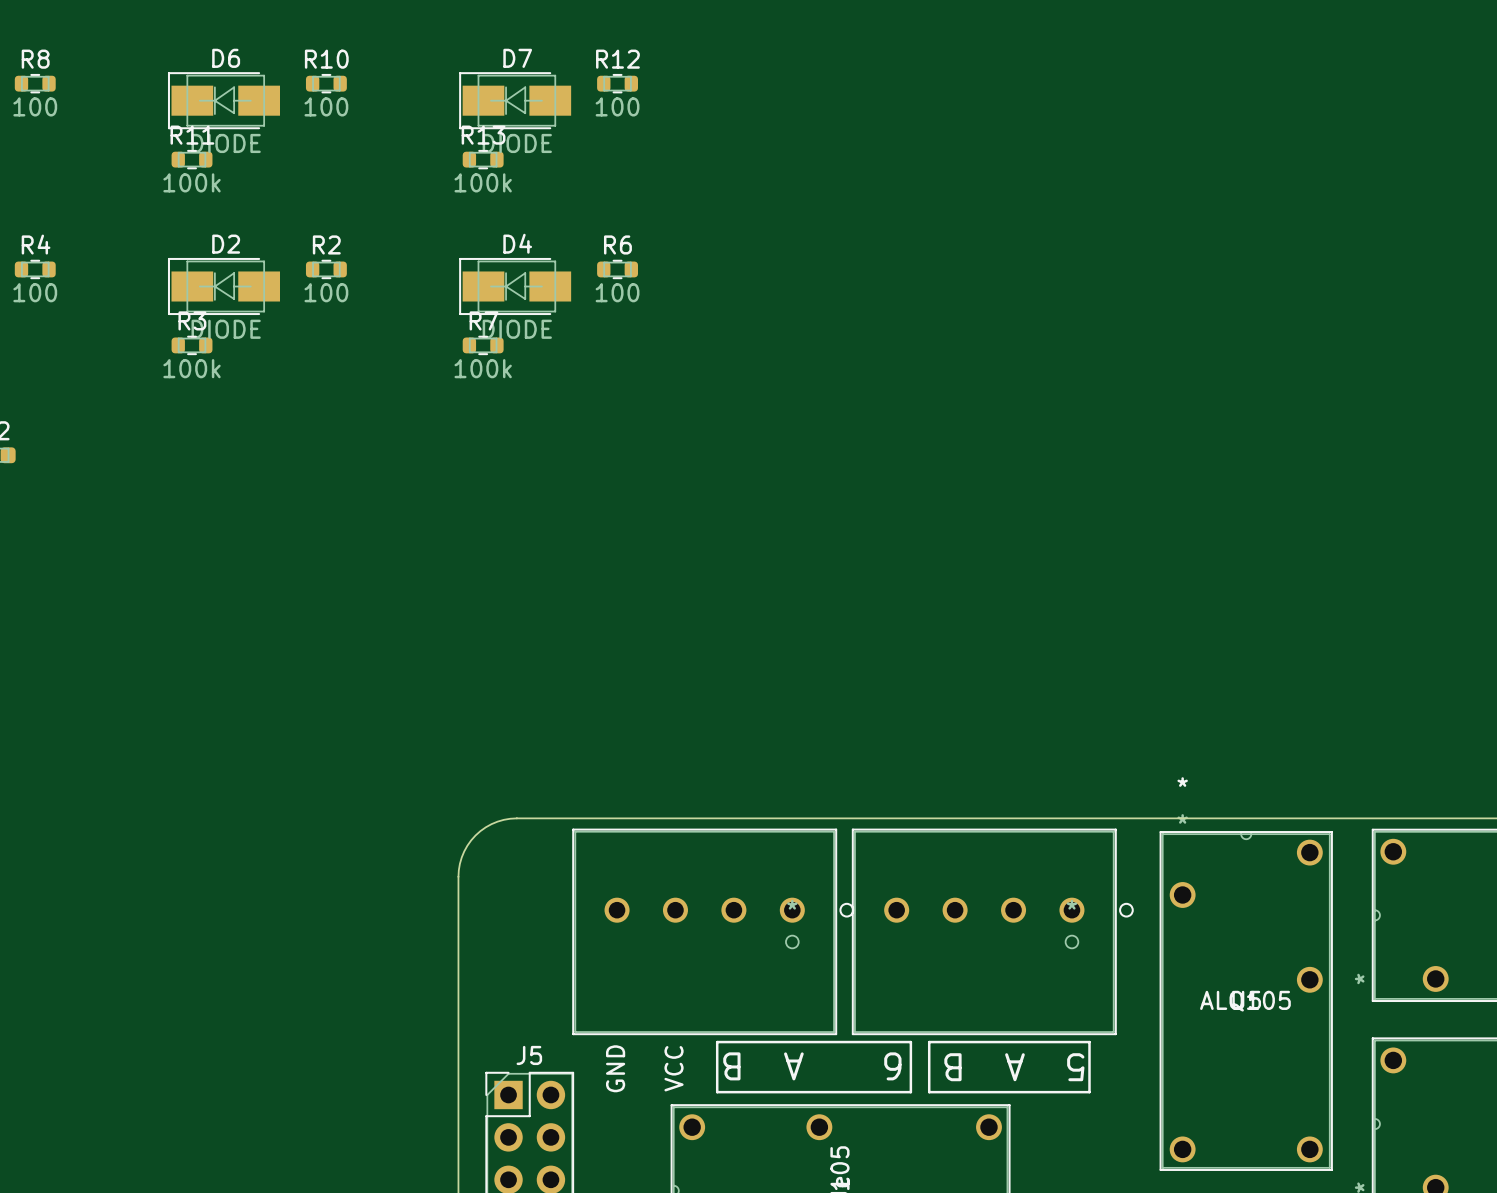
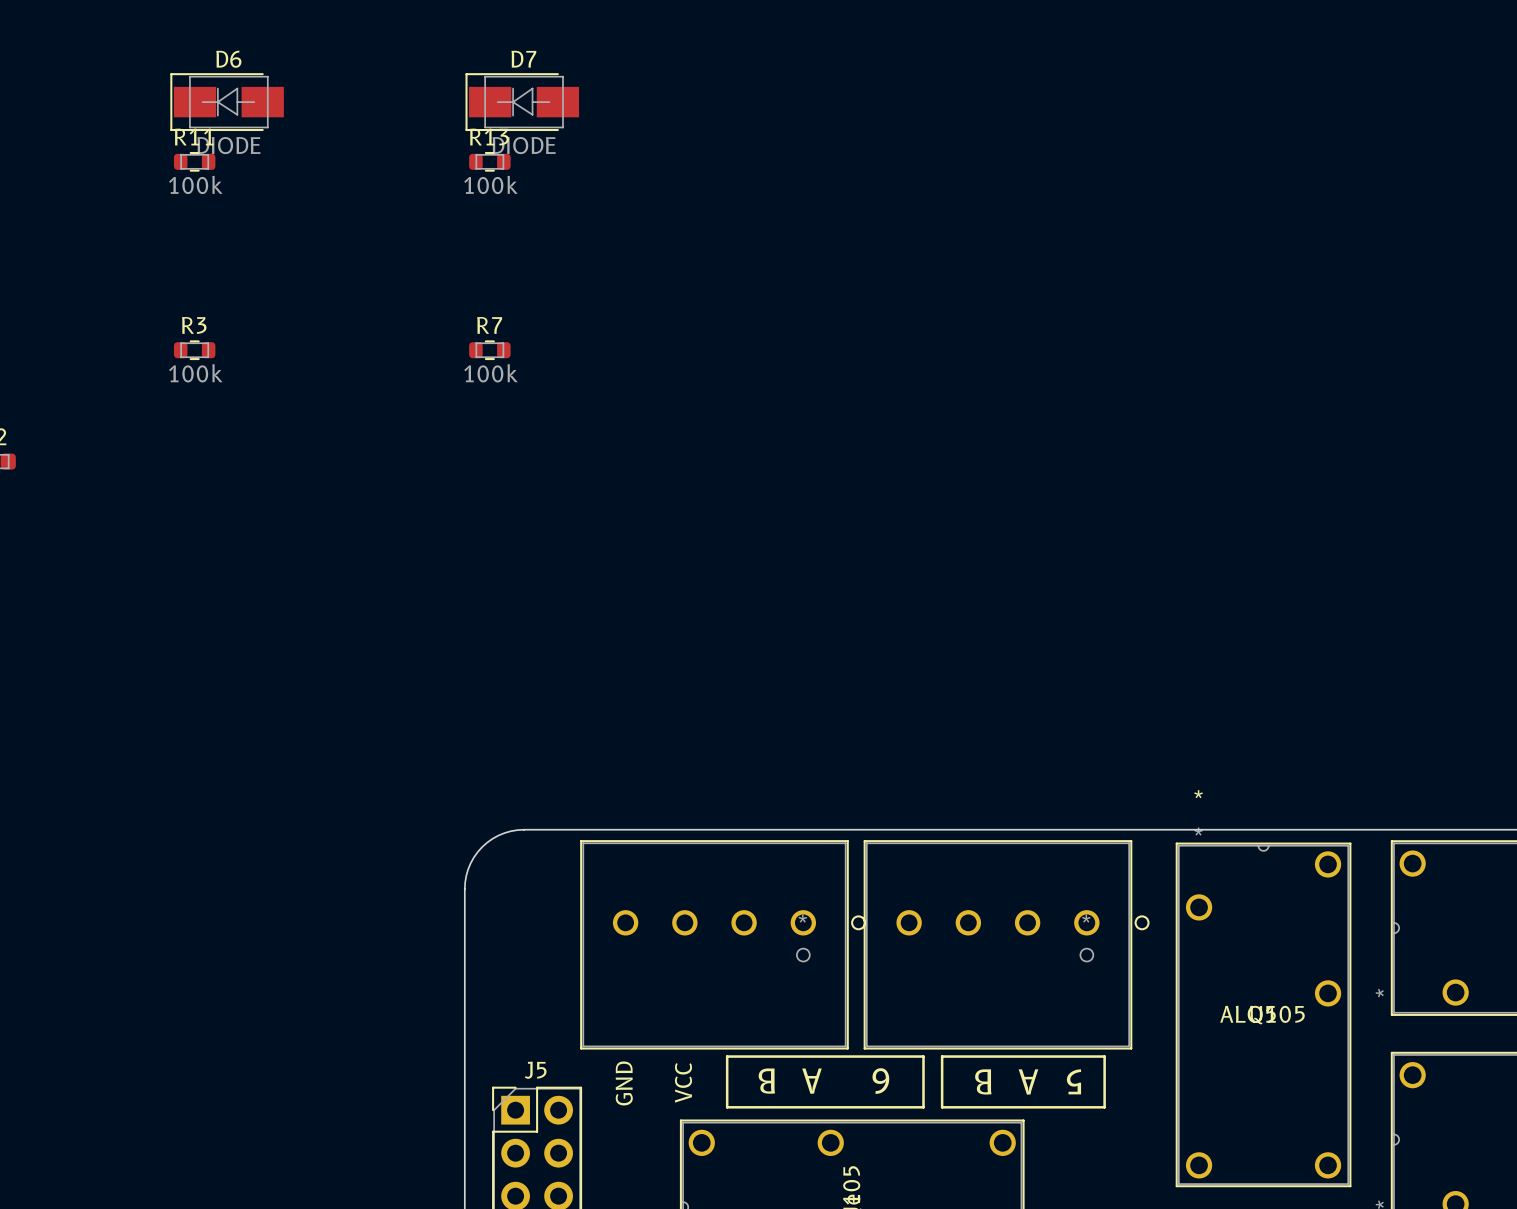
R8: 100 (35, 83) -> none
R10: 100 (326, 83) -> none
R12: 100 (617, 83) -> none
R4: 100 (35, 269) -> none
R2: 100 (326, 269) -> none
R6: 100 (617, 269) -> none
D2: DIODE (223, 286) -> none
D4: DIODE (515, 286) -> none

